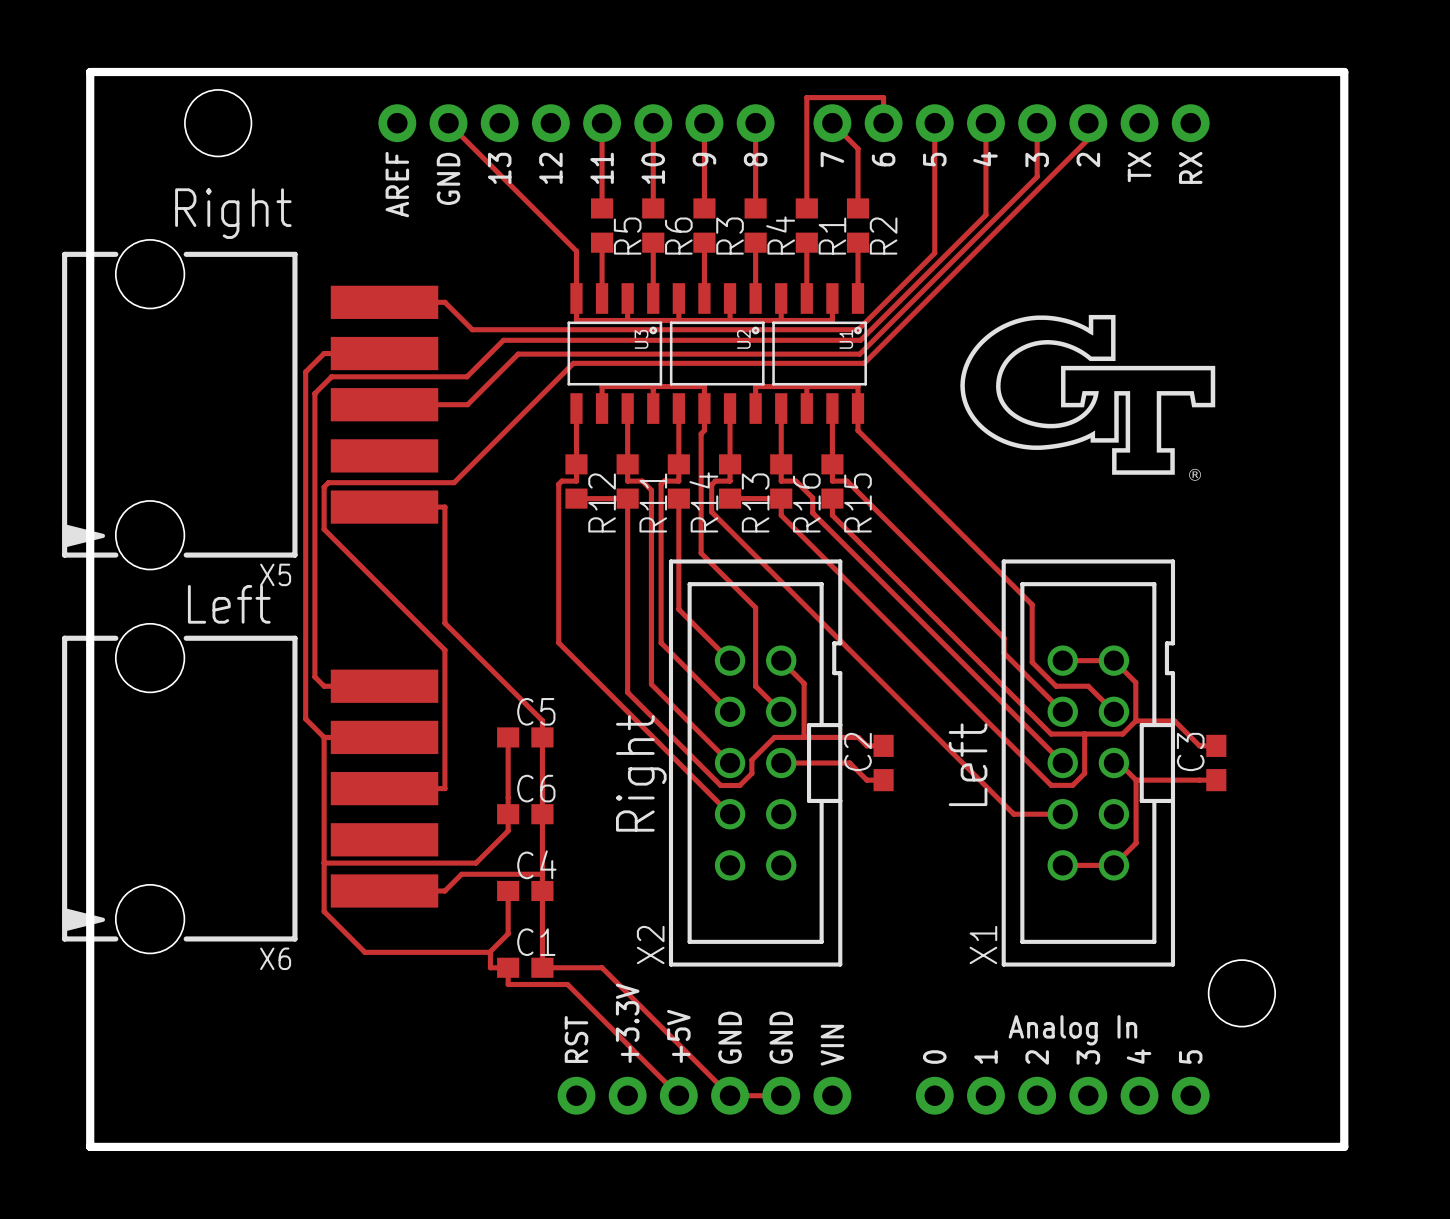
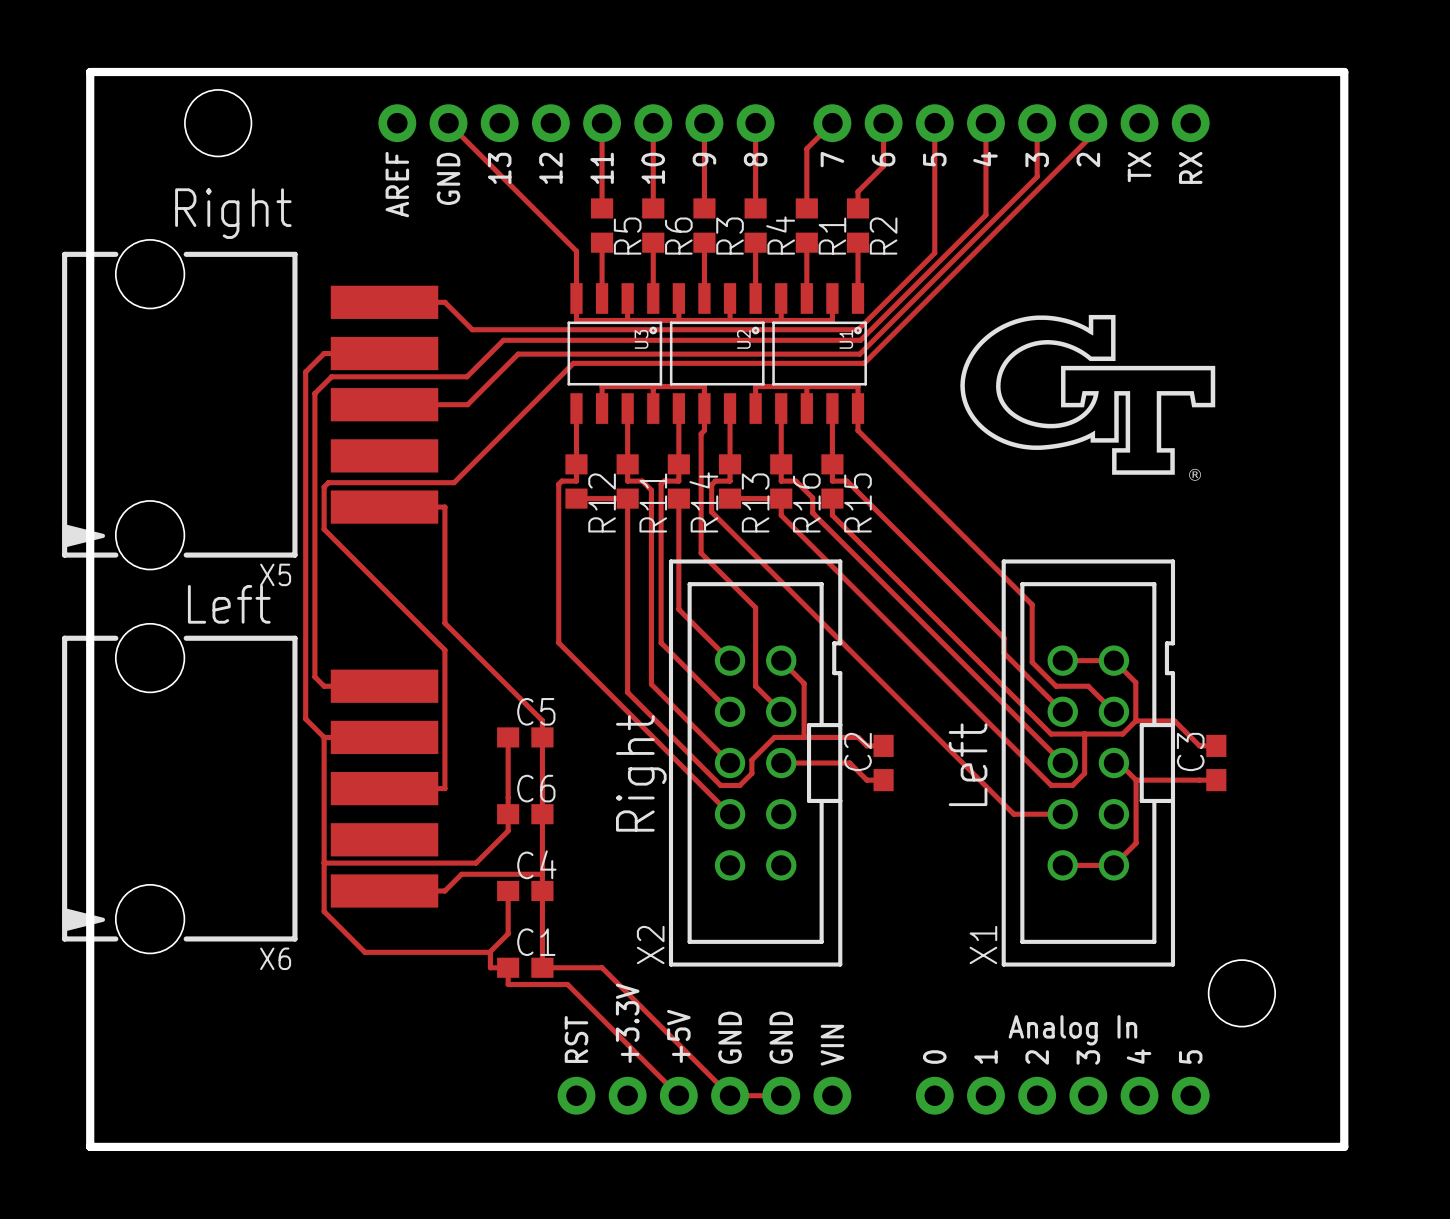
track: (832, 123) (858, 148) (858, 191) -> (883, 123) (883, 166) (858, 191)
track: (883, 123) (883, 97) (806, 97) (806, 148) -> (832, 123) (806, 148)

